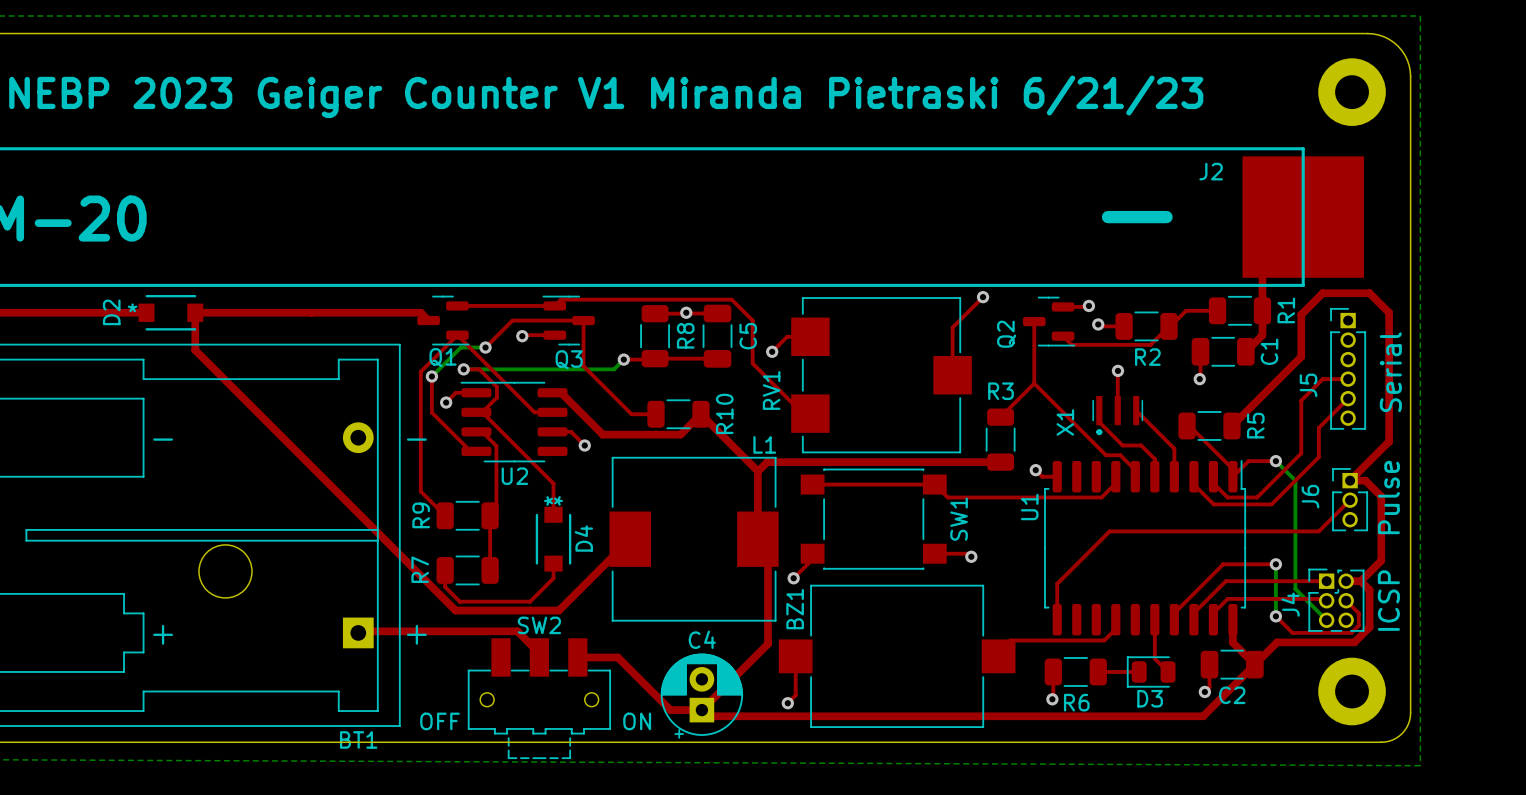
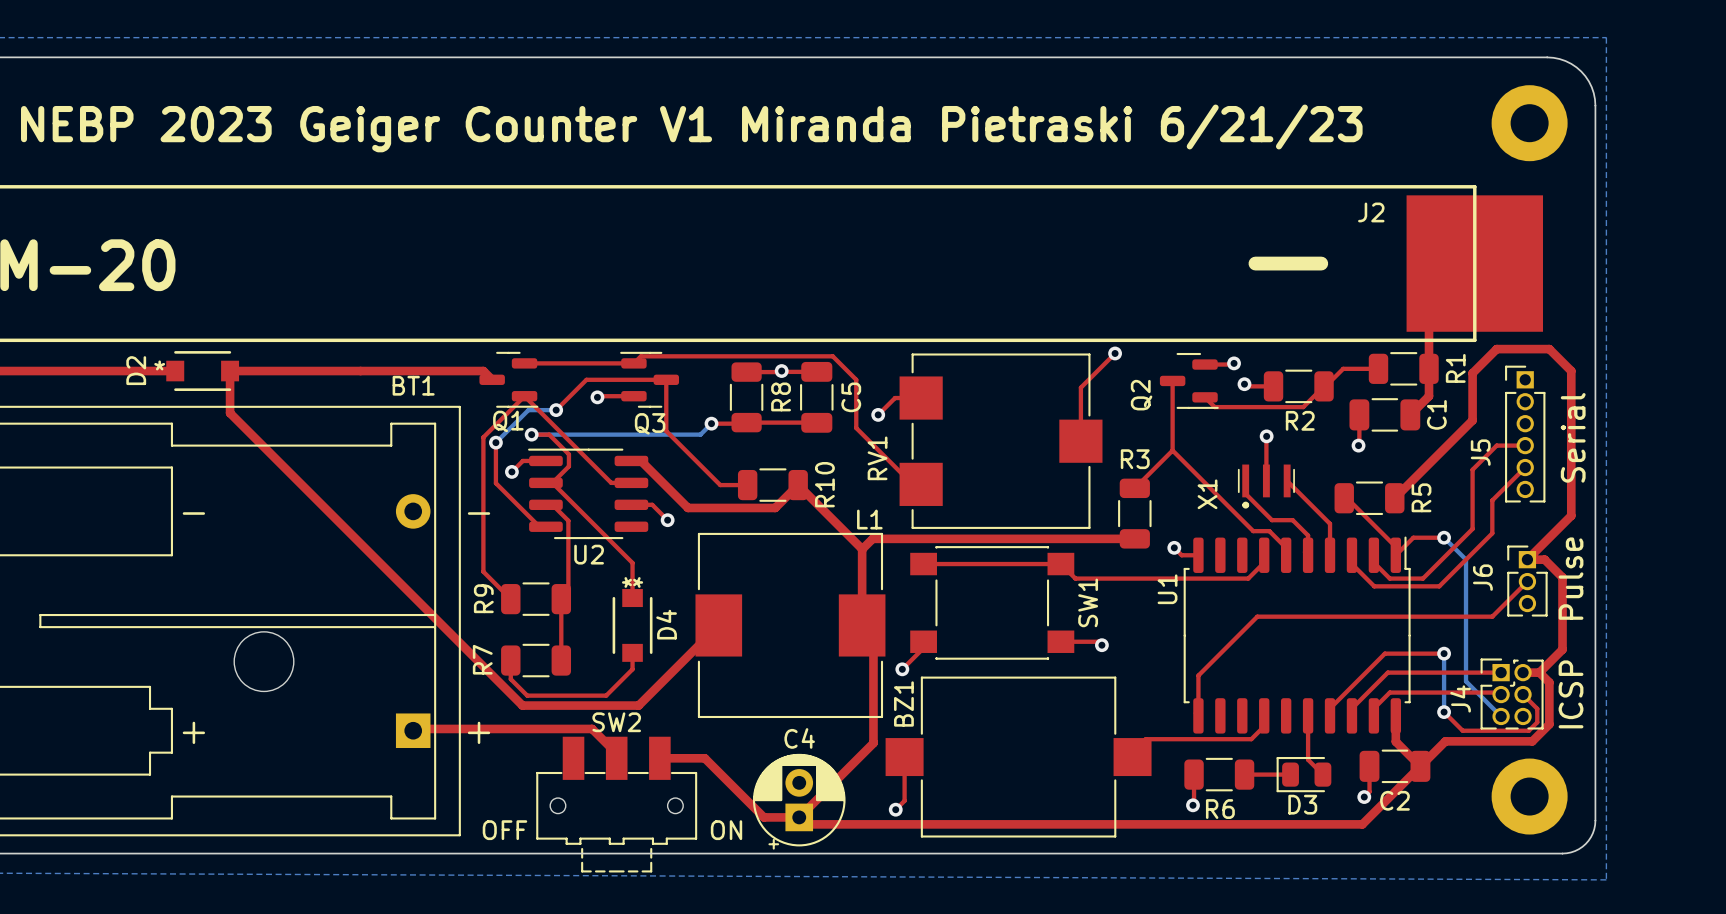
BT1 name position: BT1 (358, 739) -> BT1 (413, 385)

